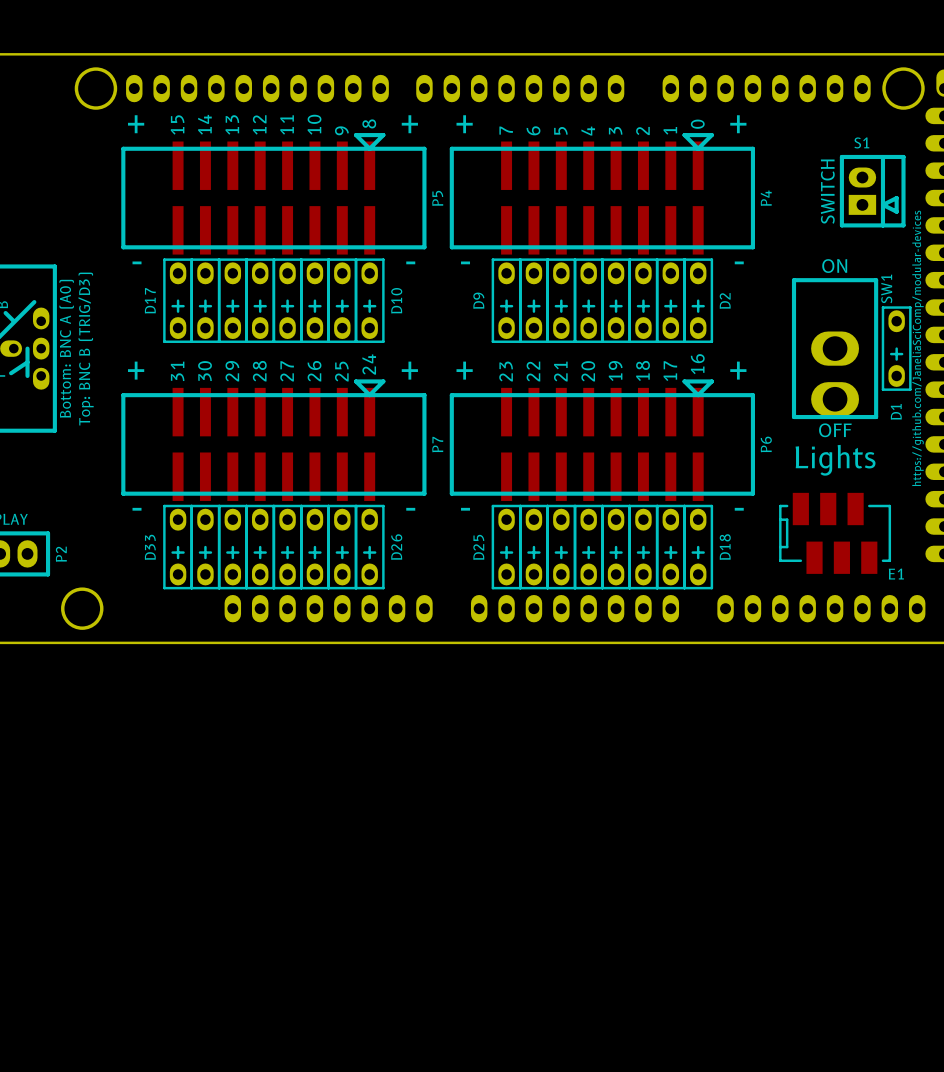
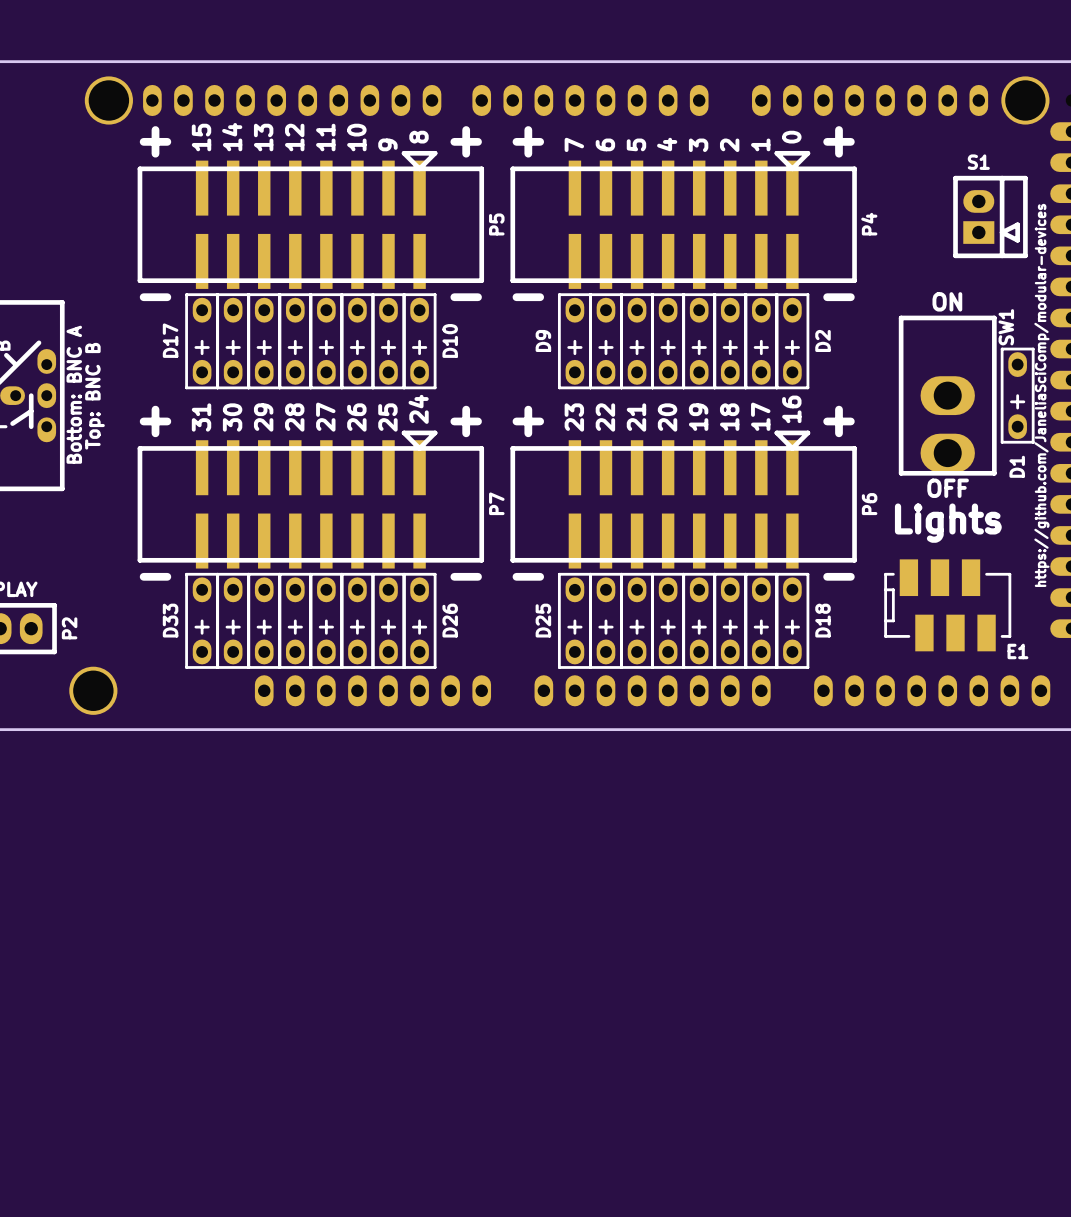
text: SWITCH (827, 191) -> none
part text: Bottom: BNC A (A0) (66, 348) -> Bottom: BNC A (74, 394)
part text: none -> Top: BNC B (94, 396)
part text: Top: BNC B (TRIG/D3) (86, 349) -> none

